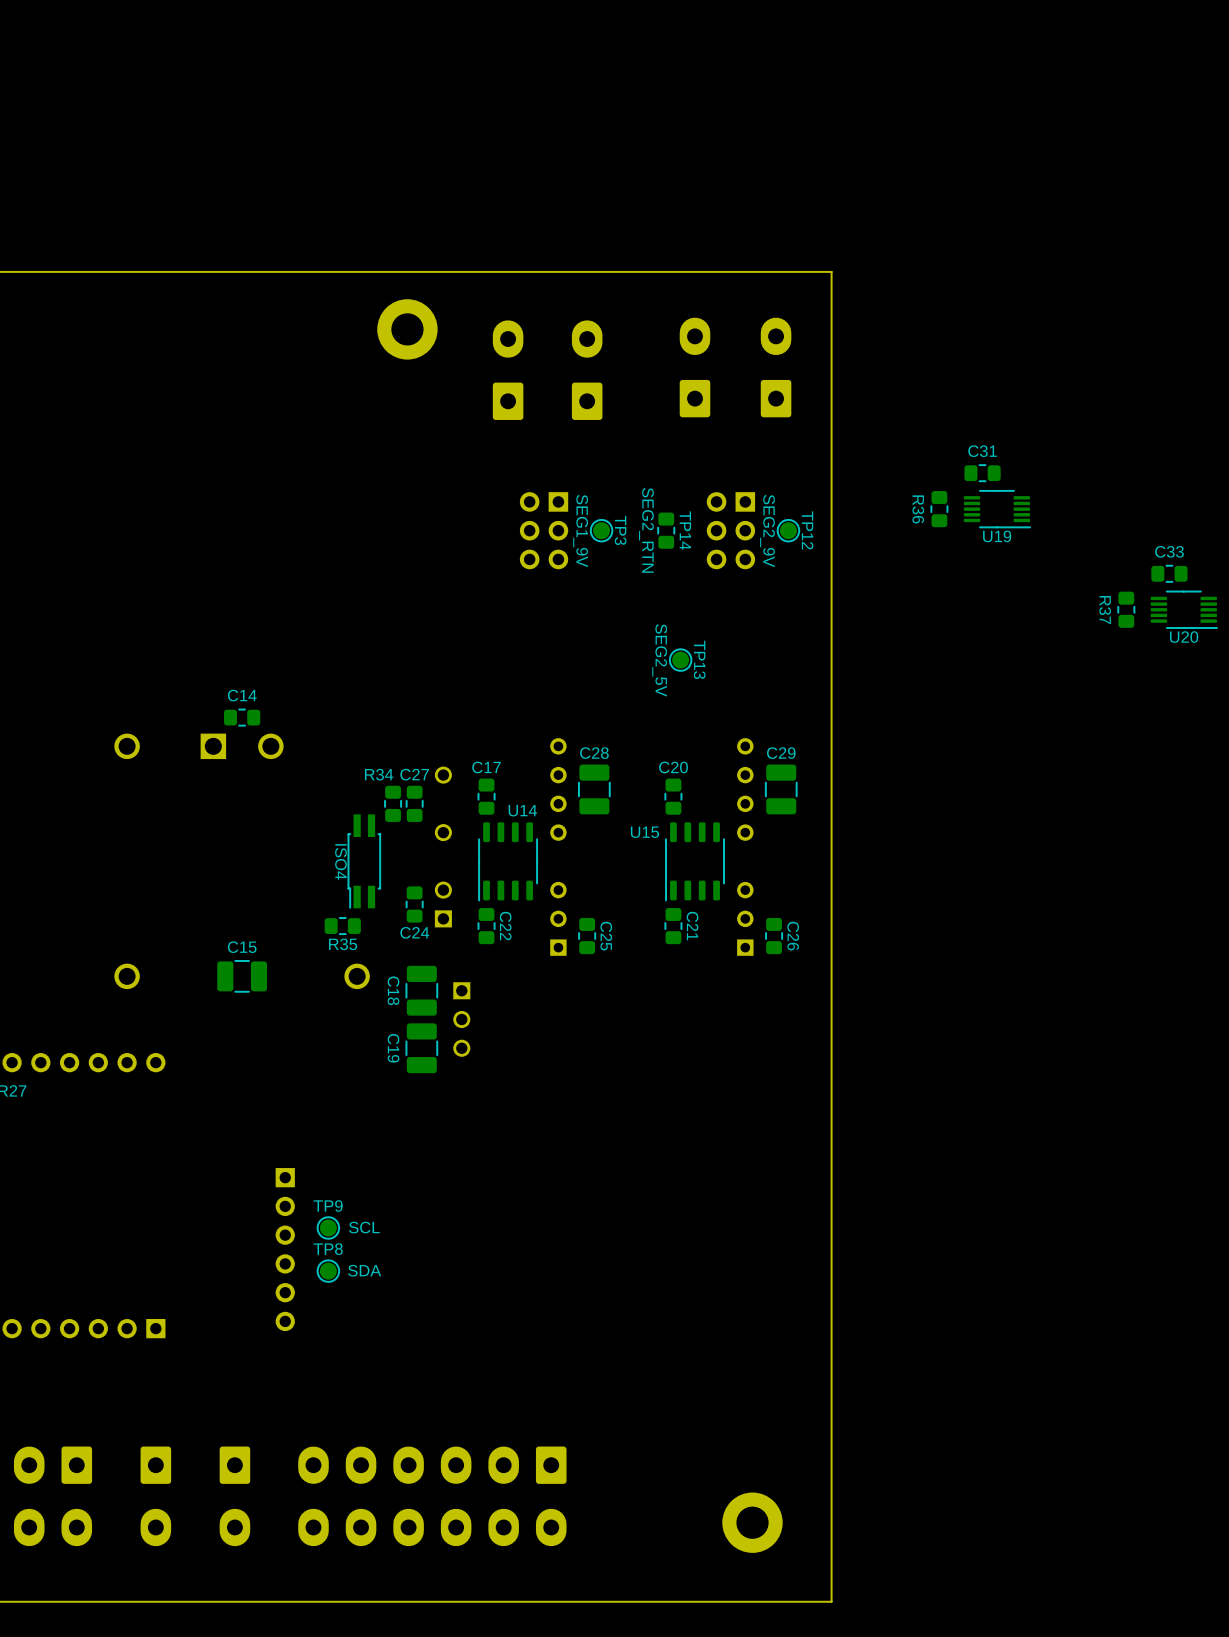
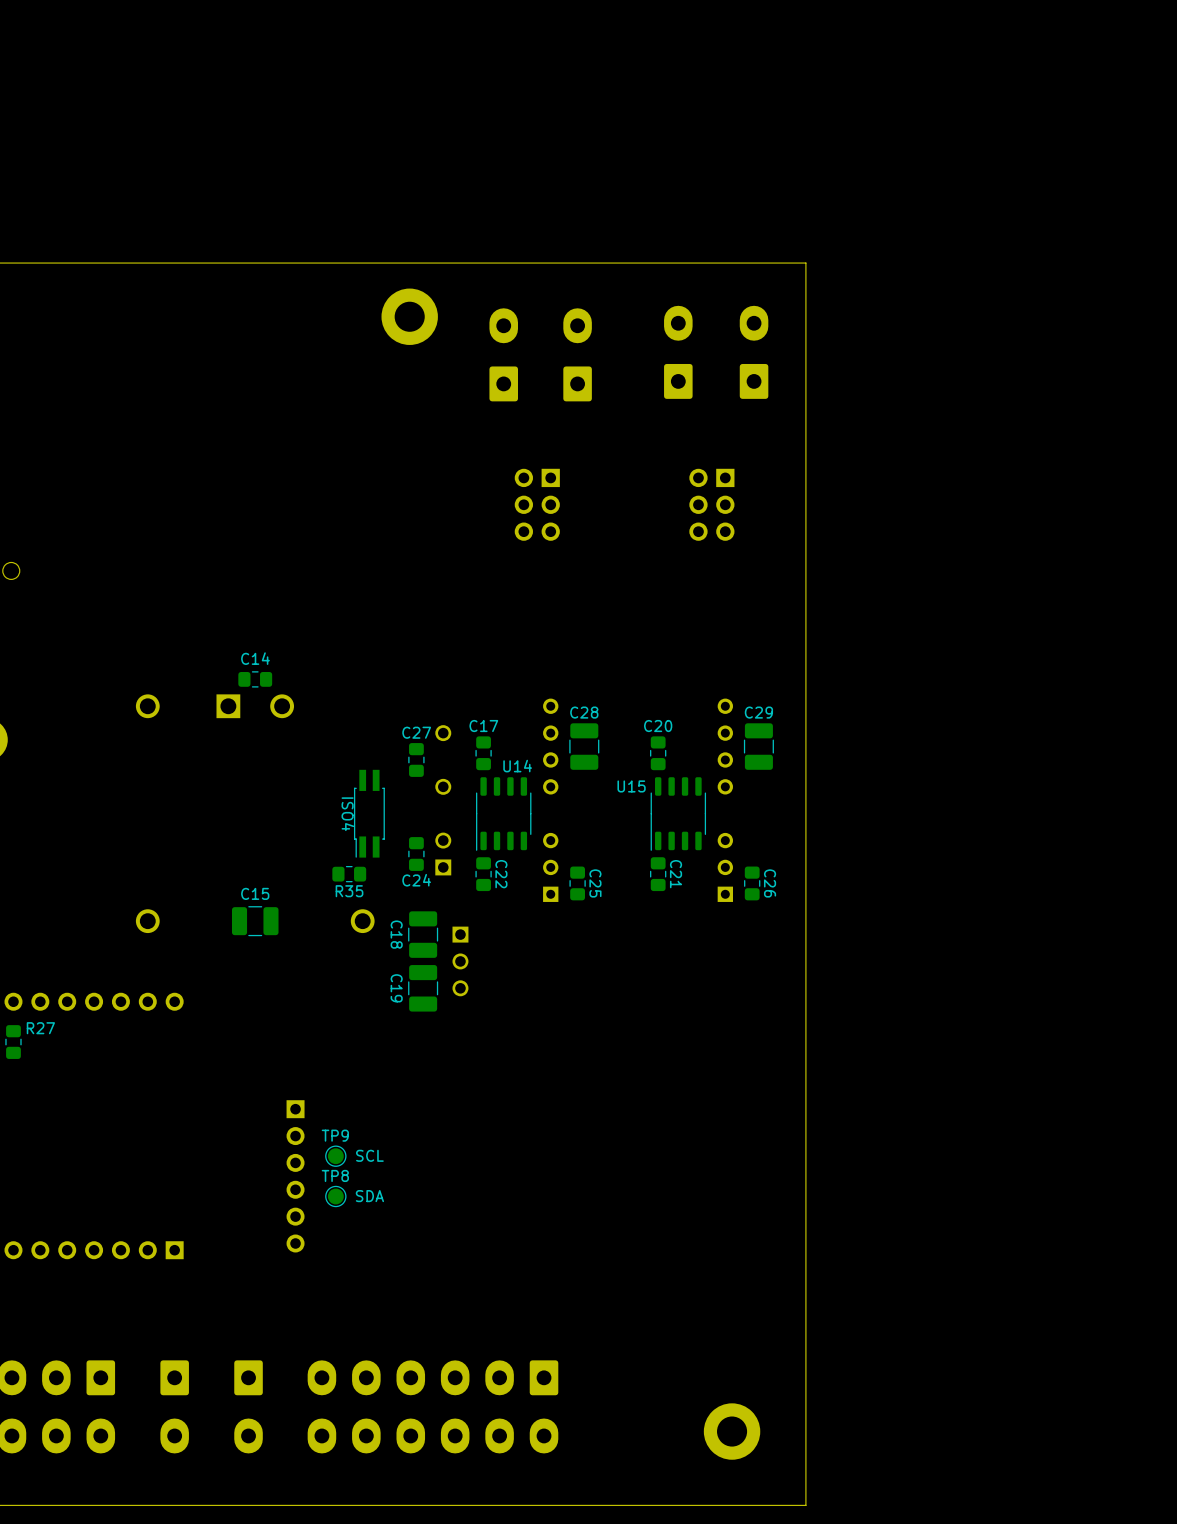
C31: (982, 473) -> none
R36: (939, 509) -> none
U19: (997, 509) -> none
TP3: SEG1_9V (601, 530) -> none
TP14: SEG2_RTN (666, 530) -> none
TP12: SEG2_9V (788, 530) -> none
C33: (1169, 573) -> none
R37: (1126, 609) -> none
U20: (1184, 609) -> none
TP13: SEG2_5V (680, 660) -> none
R34: (393, 803) -> none

